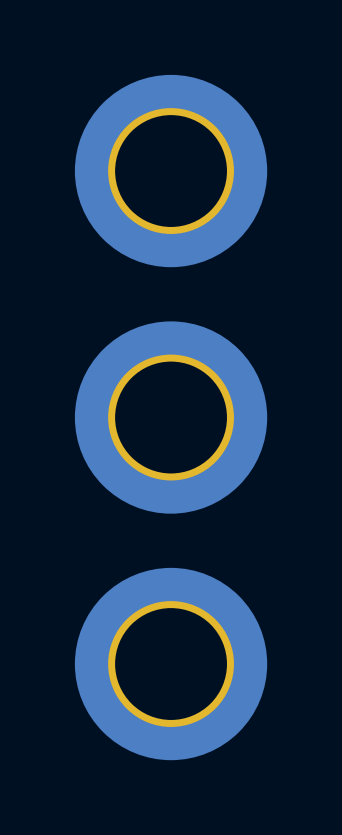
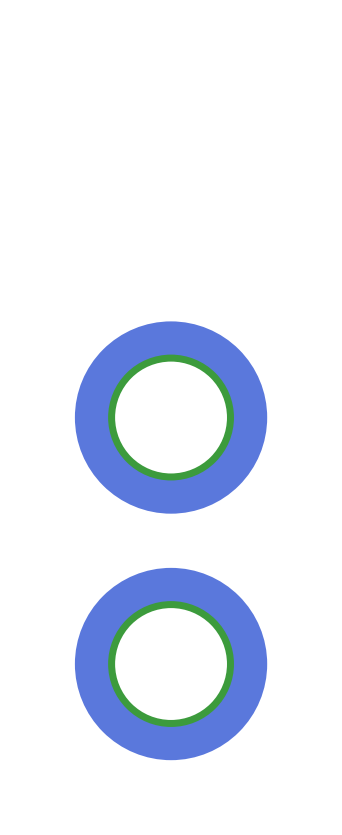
part: (171, 171) -> none

